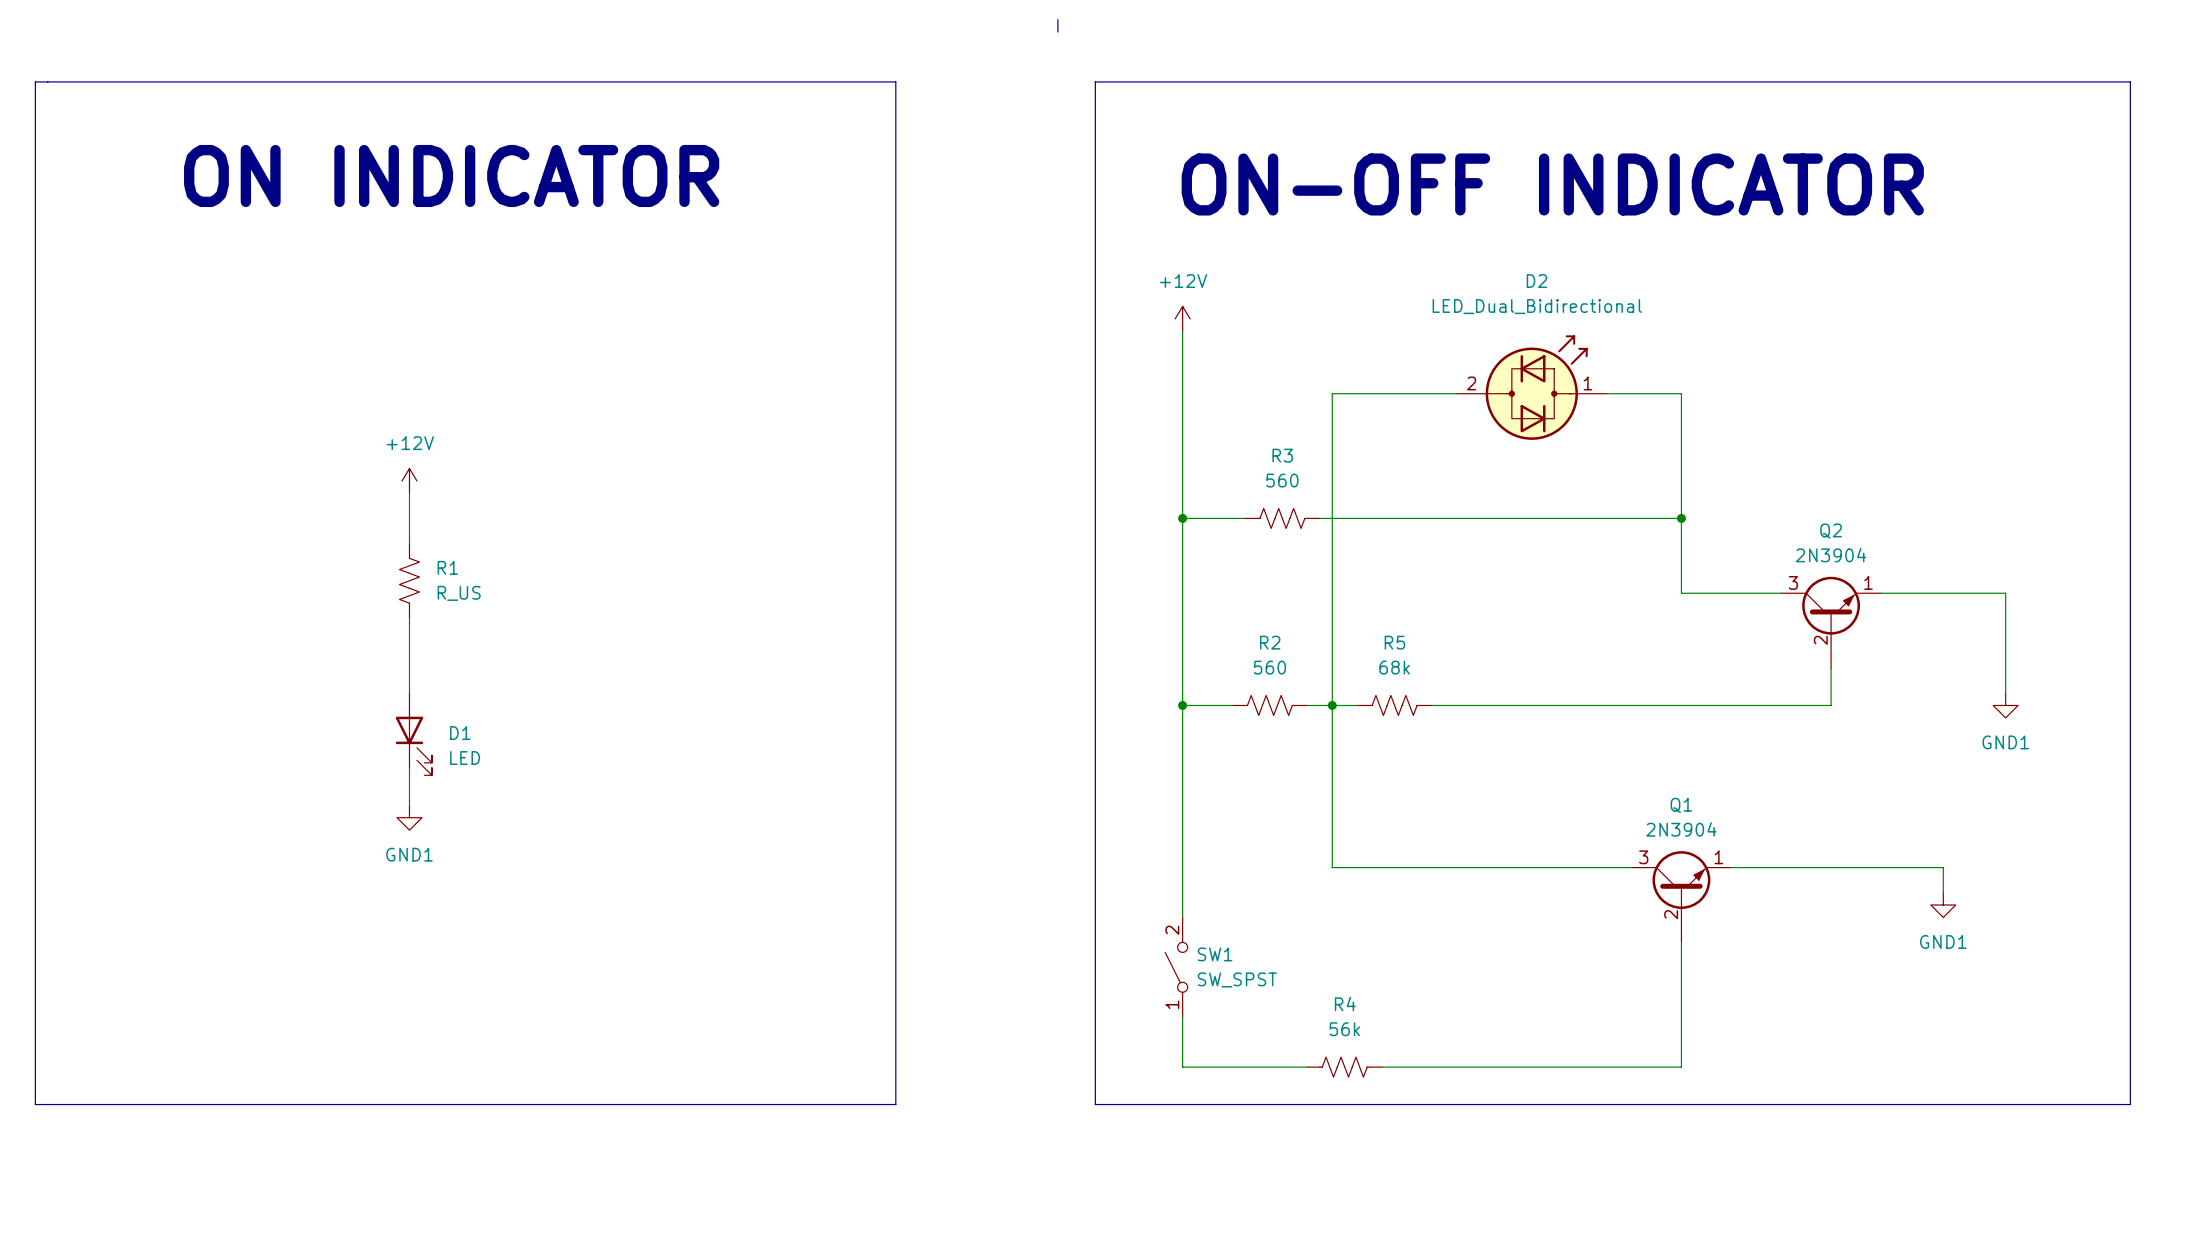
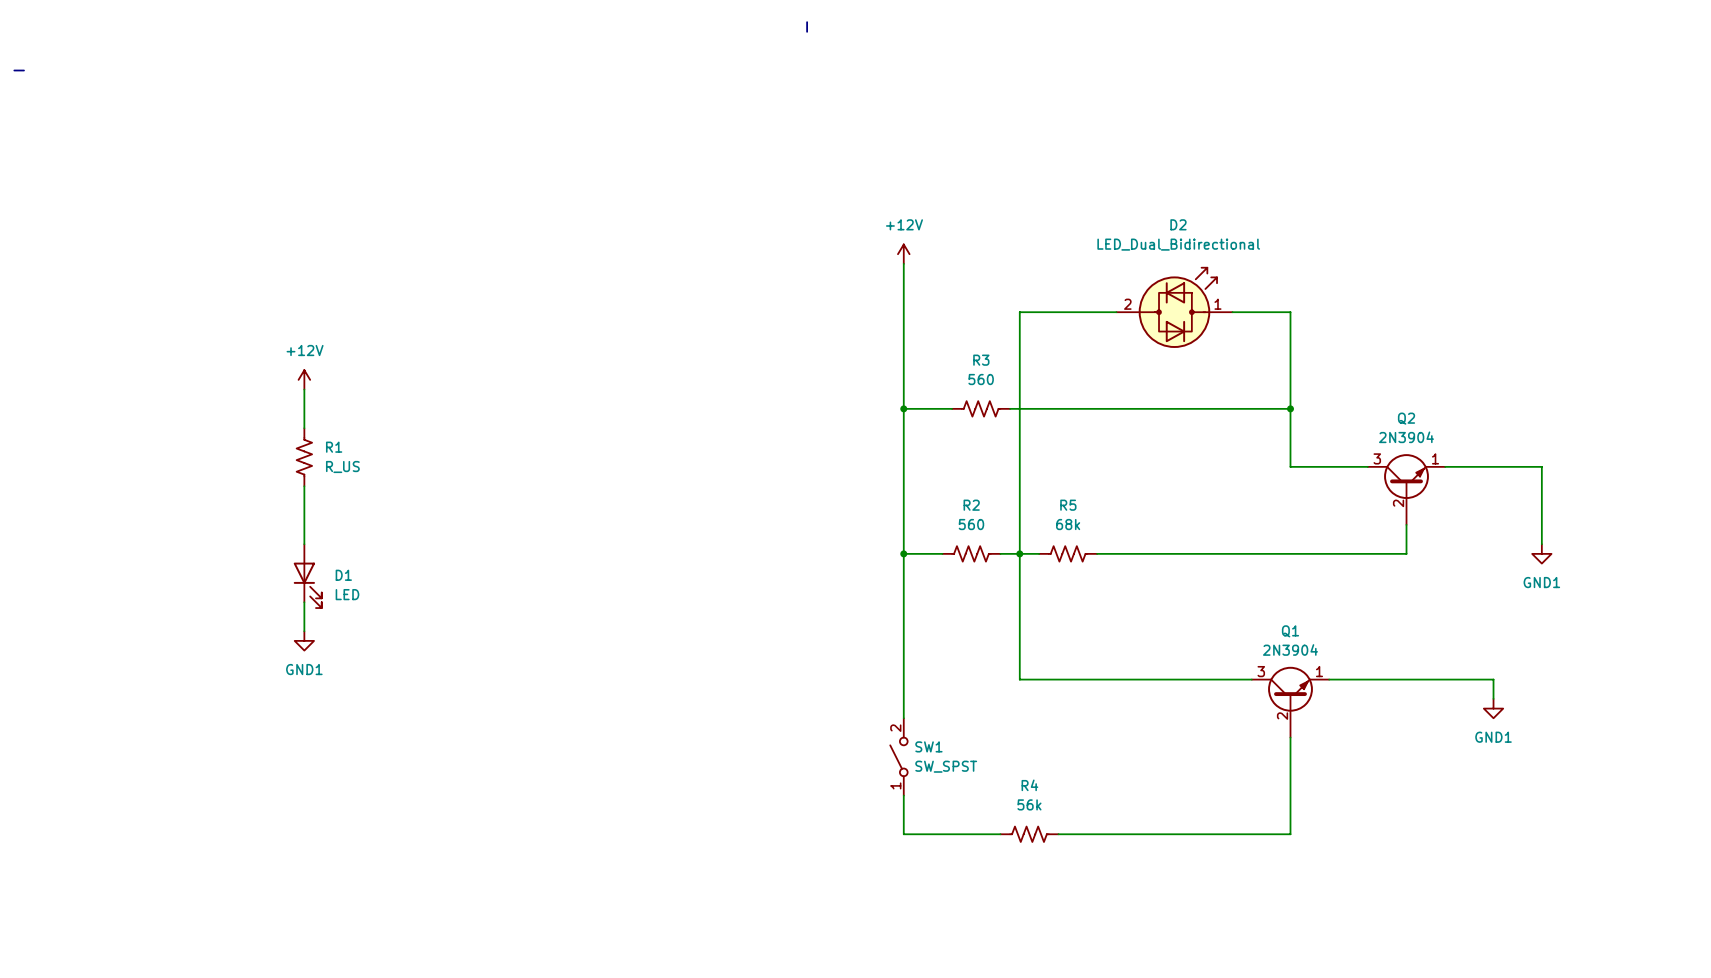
line: (35, 81) (35, 1104) (895, 1104) (895, 81) (47, 81) -> none
line: (1095, 81) (2130, 81) (2130, 1104) (1095, 1104) (1095, 81) -> none
text: ON INDICATOR (451, 175) -> none
text: ON-OFF INDICATOR (1552, 184) -> none

